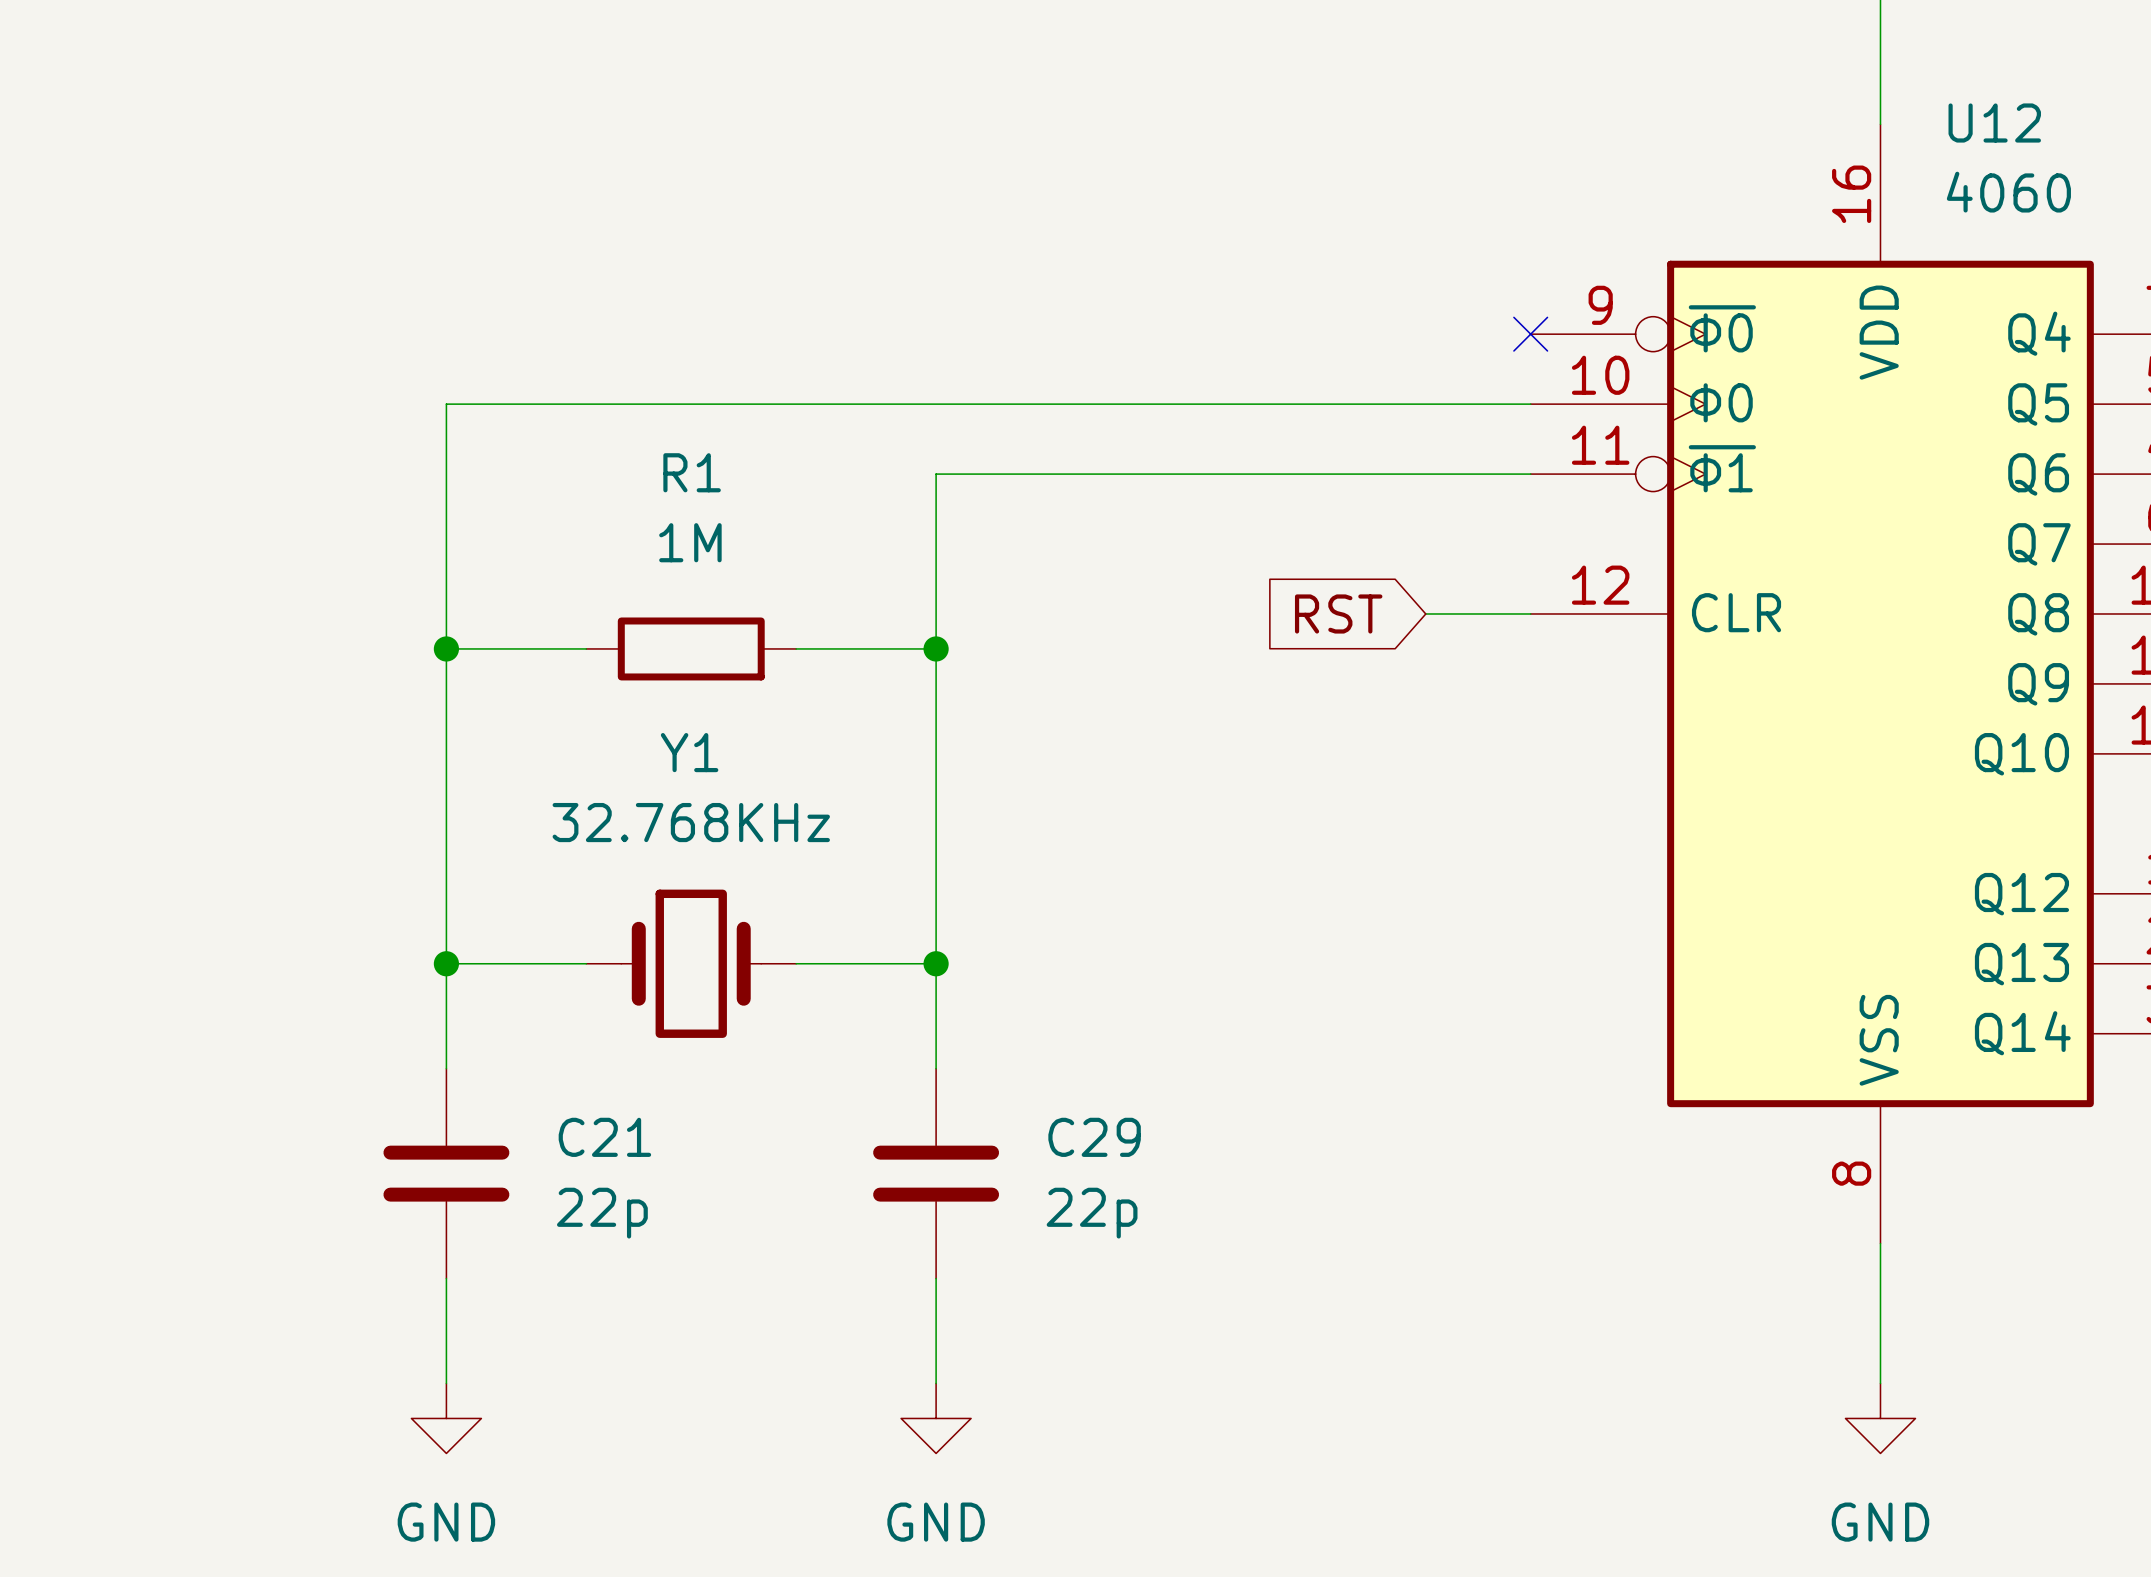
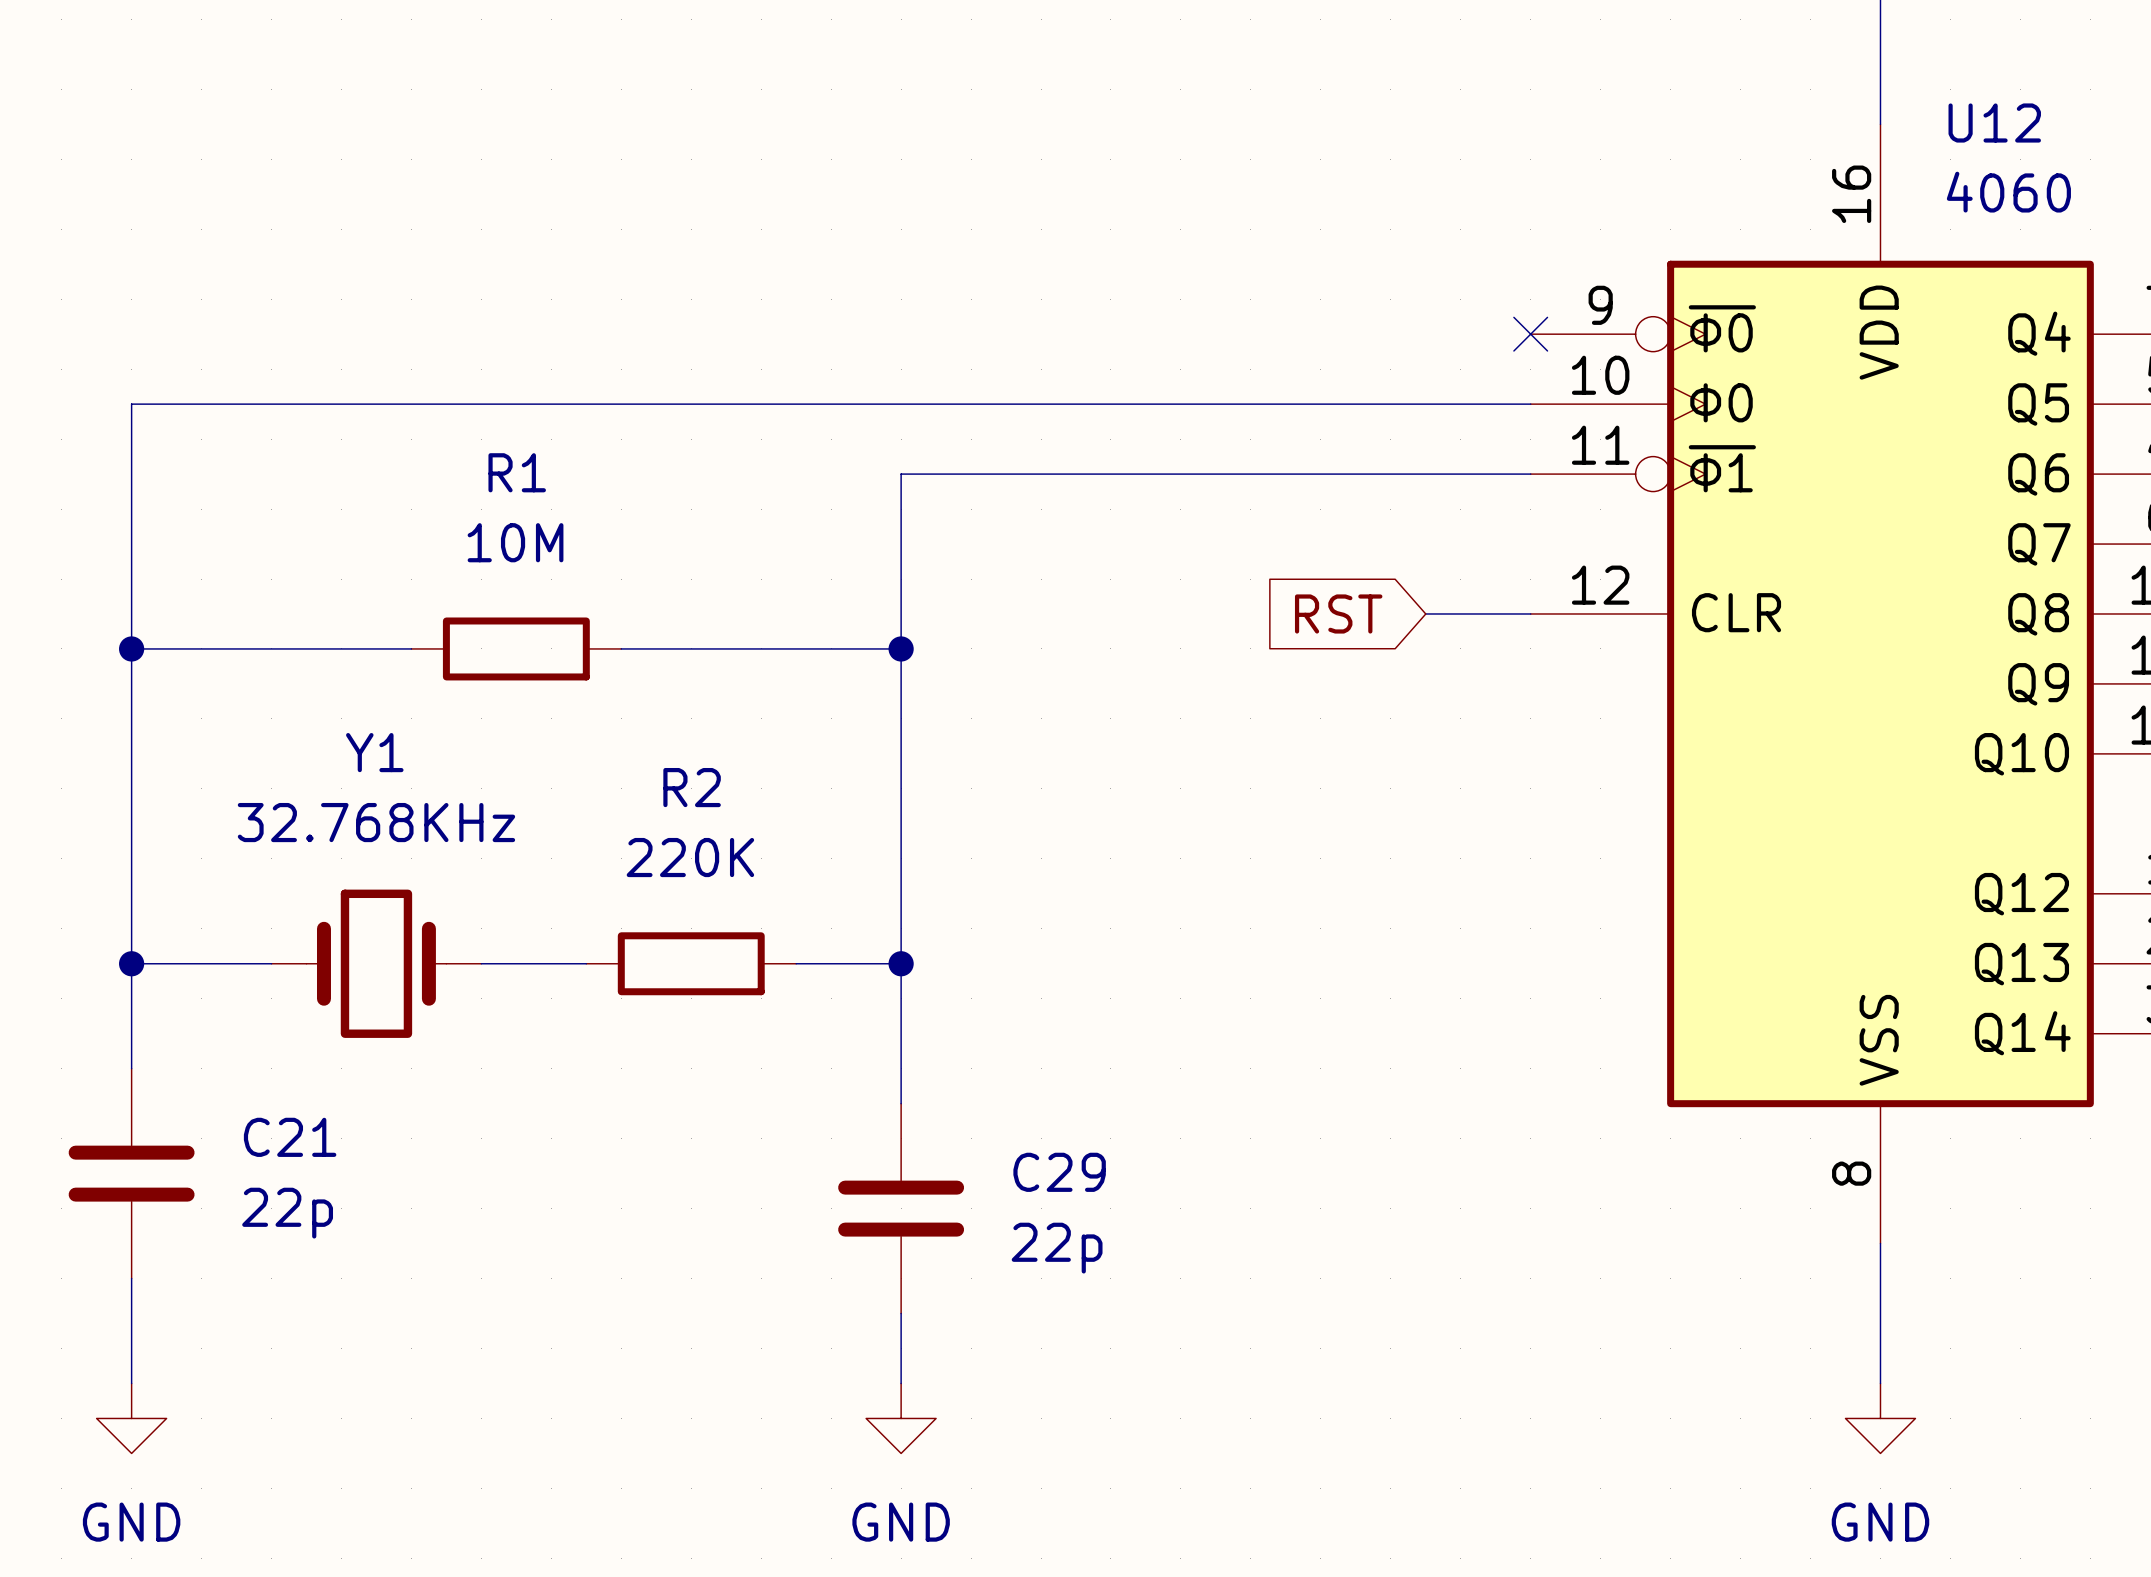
wire: (446, 404) (446, 1068) -> (446, 404) (131, 404) (131, 1068)
wire: (936, 474) (936, 1068) -> (936, 474) (901, 474) (901, 1103)
R1 value: 1M (690, 542) -> 10M (515, 542)
wire: none -> (131, 648) (411, 648)
junction: none -> (131, 648)
wire: (446, 648) (586, 648) -> (131, 963) (271, 963)
junction: (446, 648) -> none
wire: none -> (621, 648) (796, 648)
R1 position: (691, 648) -> (516, 648)
wire: (901, 648) (936, 648) -> none
junction position: (936, 648) -> (901, 648)
junction: none -> (131, 963)
junction: (446, 963) -> none
Y1 position: (691, 963) -> (376, 963)
R2: none -> 220K (691, 963)
wire: (901, 963) (936, 963) -> none
junction position: (936, 963) -> (901, 963)
C21 position: (446, 1173) -> (131, 1173)
C29 position: (936, 1173) -> (901, 1208)
wire: (446, 1278) (446, 1383) -> (131, 1278) (131, 1383)
wire: (936, 1278) (936, 1383) -> none
wire: none -> (901, 1313) (901, 1383)
power symbol: none -> GND (131, 1418)
power symbol: GND (446, 1418) -> none
power symbol position: GND (936, 1418) -> GND (901, 1418)

